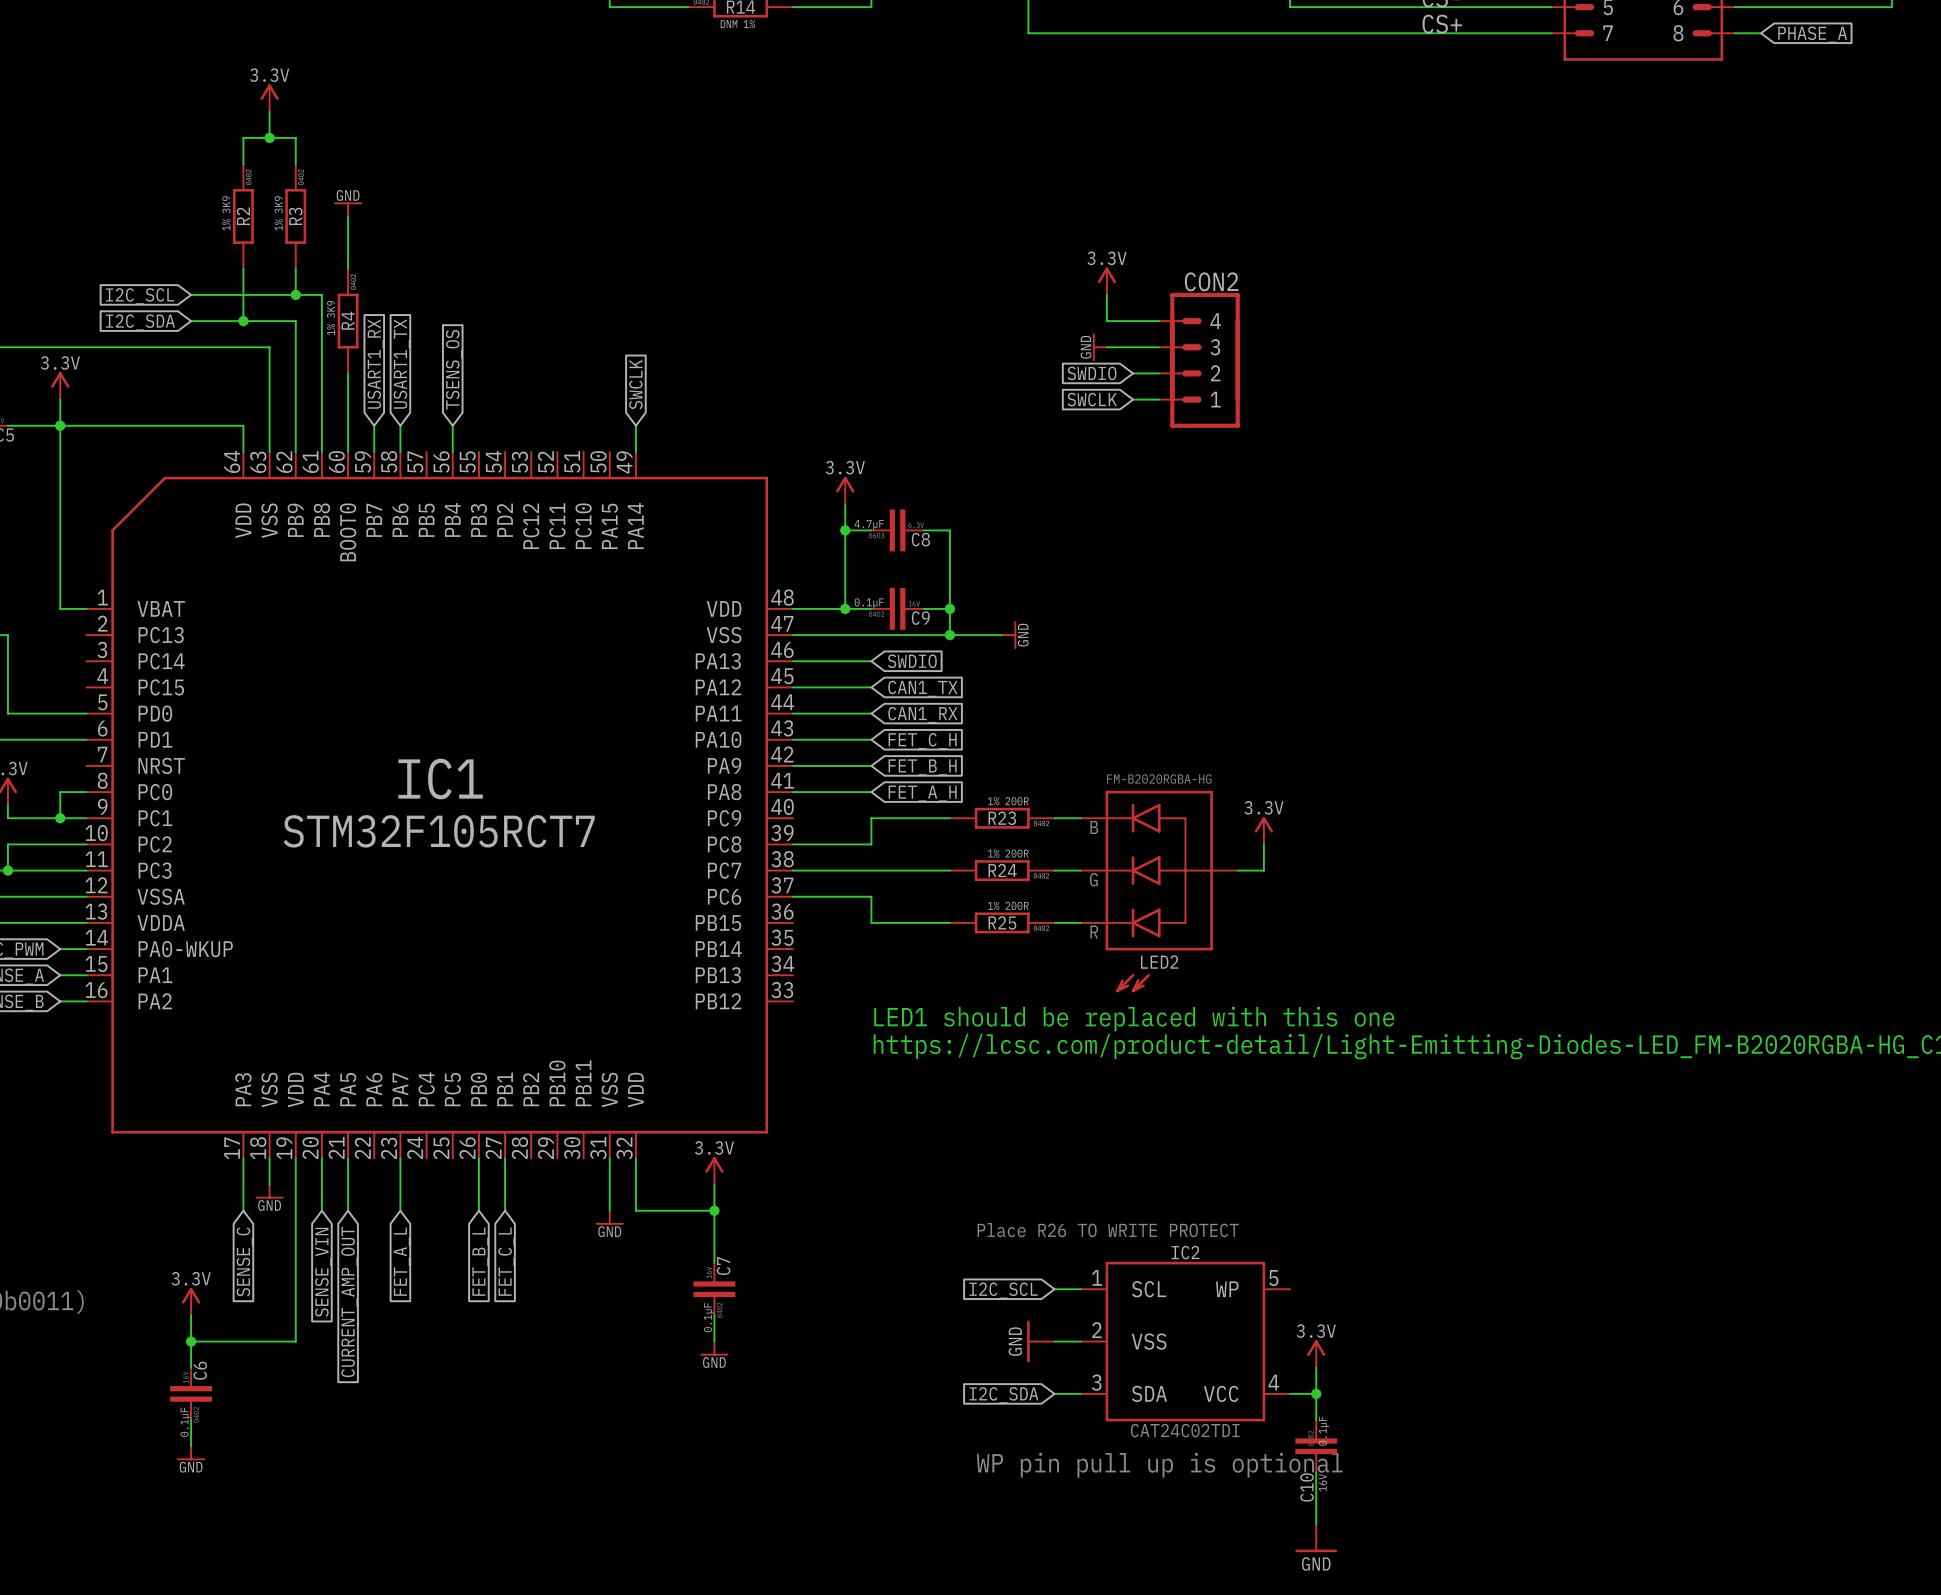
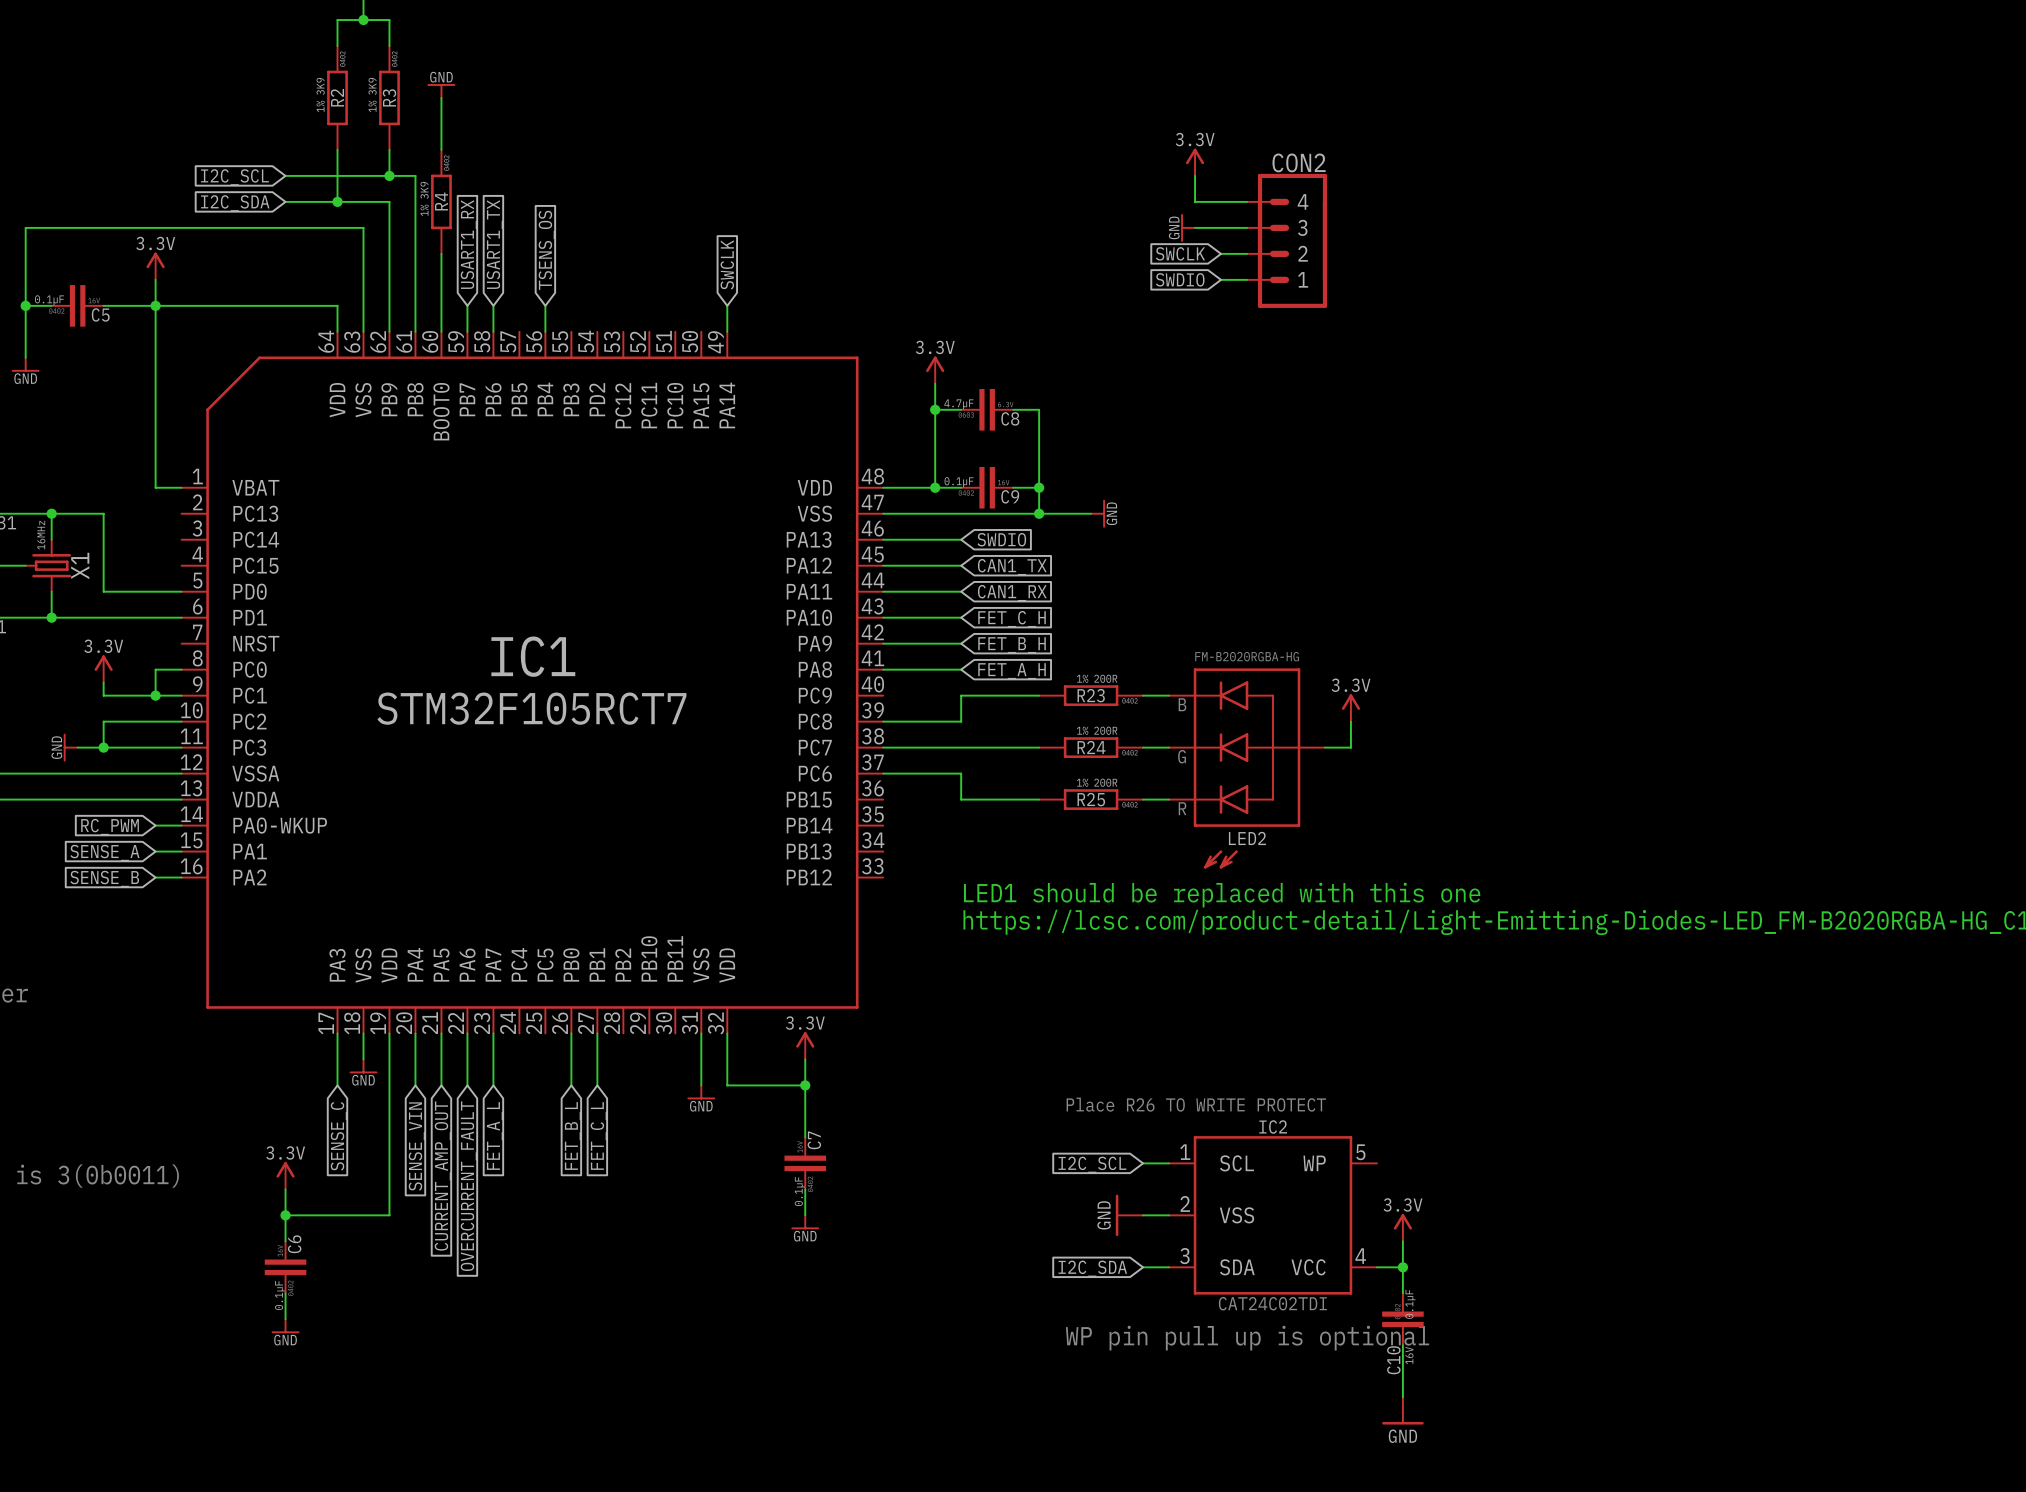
global label: SWDIO (1091, 373) -> SWCLK (1180, 253)
global label: SWCLK (1092, 399) -> SWDIO (1180, 279)
wire: none -> (467, 1033) (467, 1085)
global label: none -> OVERCURRENT_FAULT (468, 1186)

